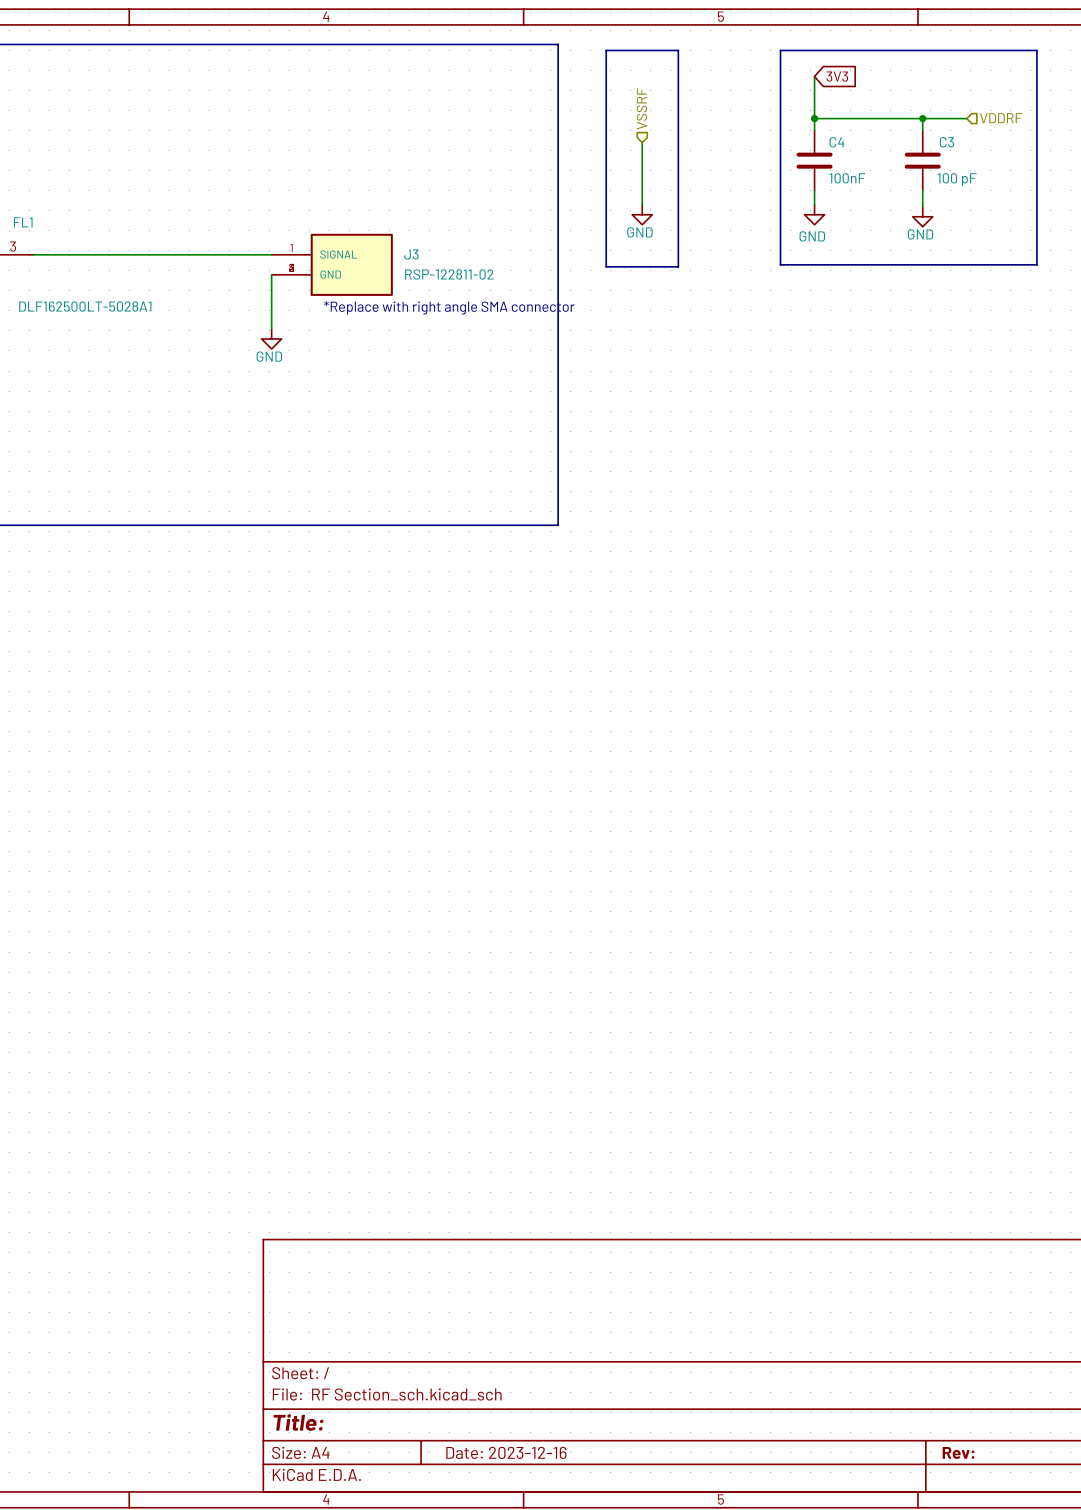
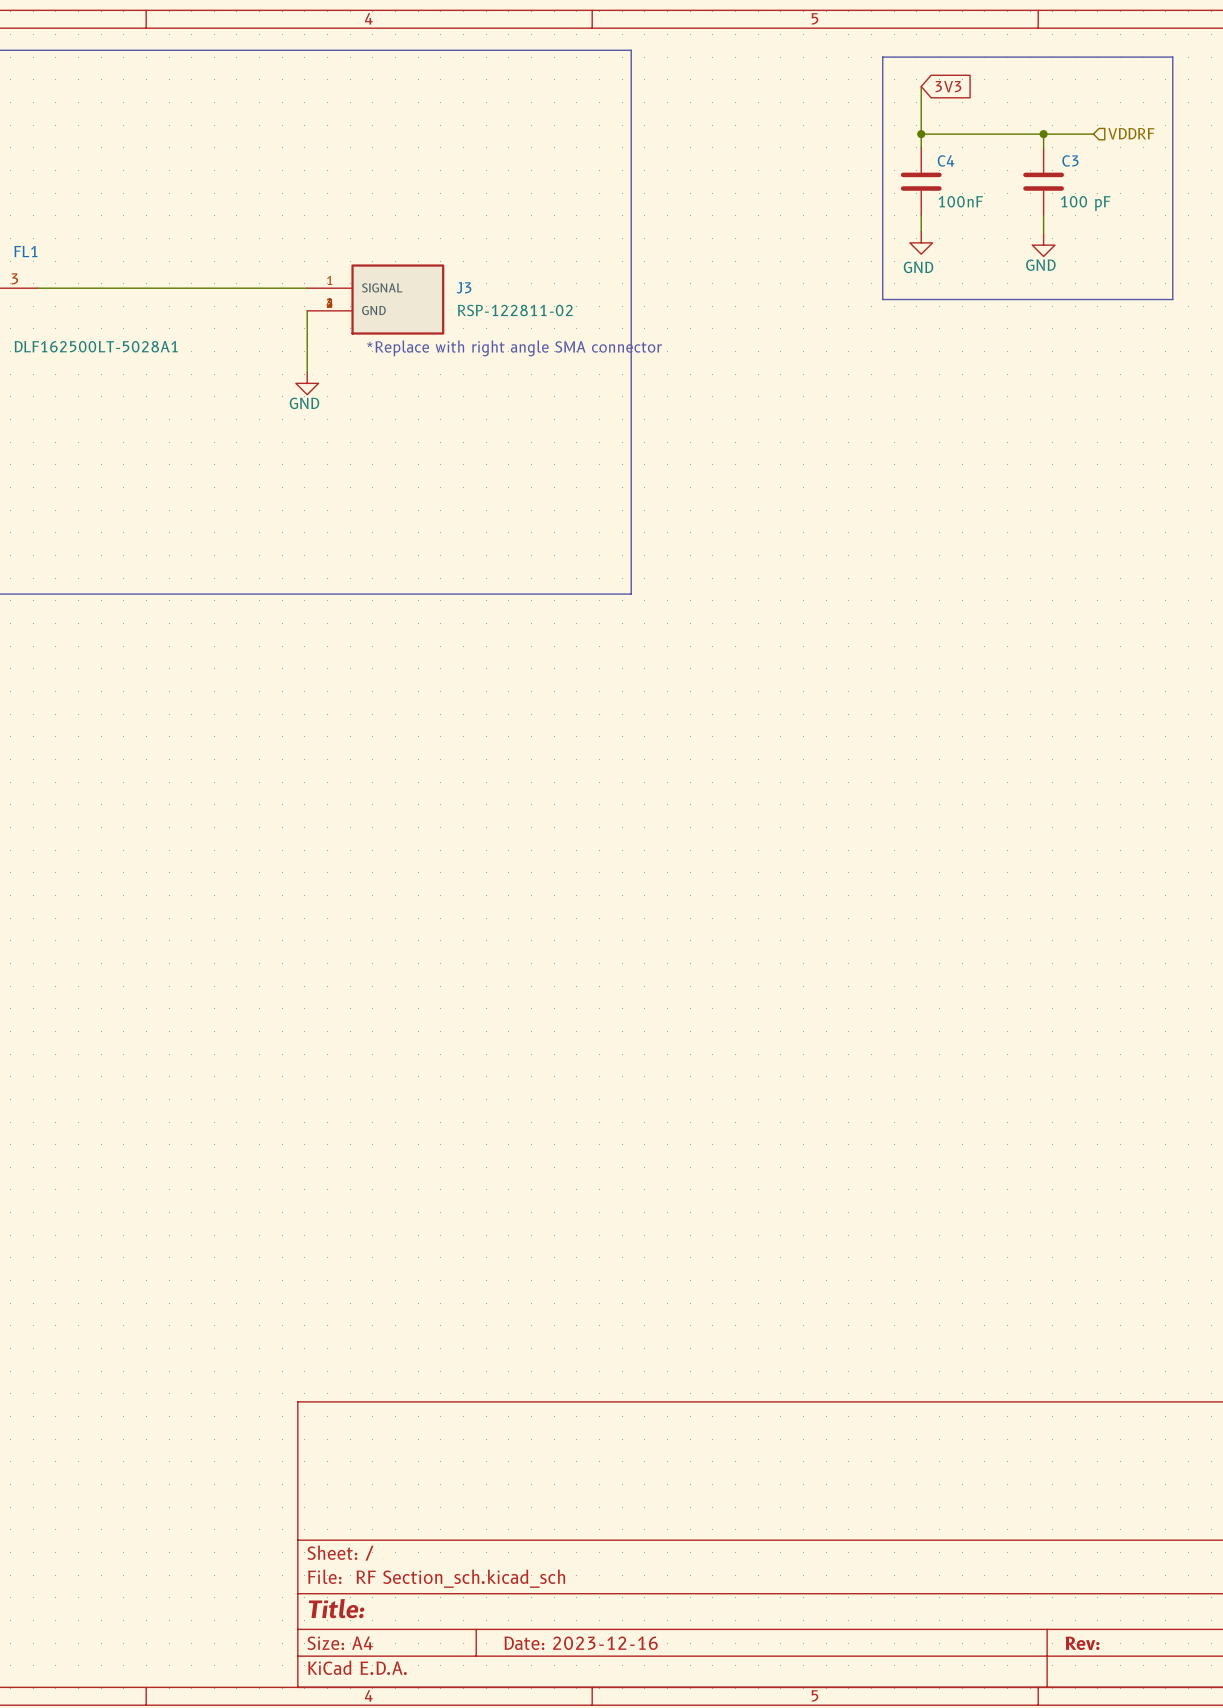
line: (606, 50) (678, 50) (678, 266) (606, 266) (606, 50) -> none
hierarchical label: VSSRF (641, 108) -> none
wire: (642, 142) (642, 204) -> none
power symbol: GND (642, 214) -> none

